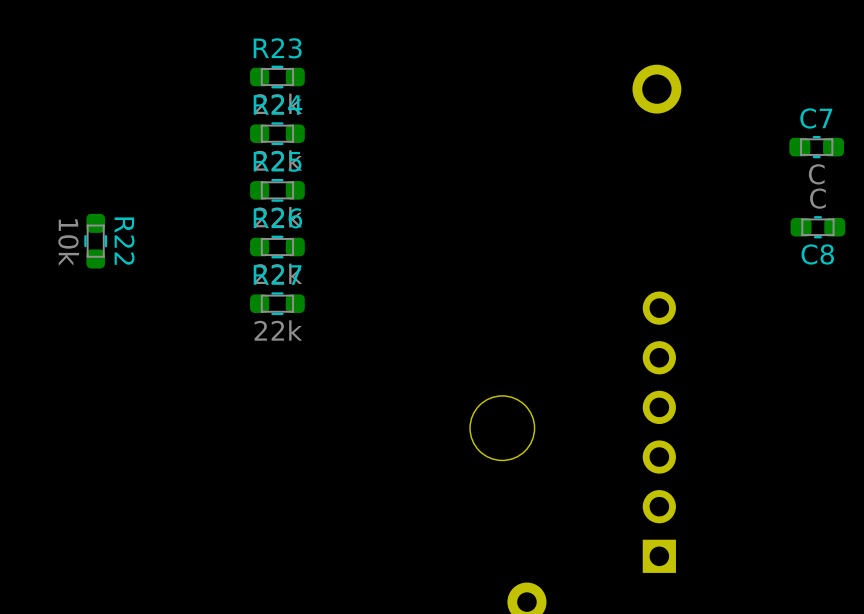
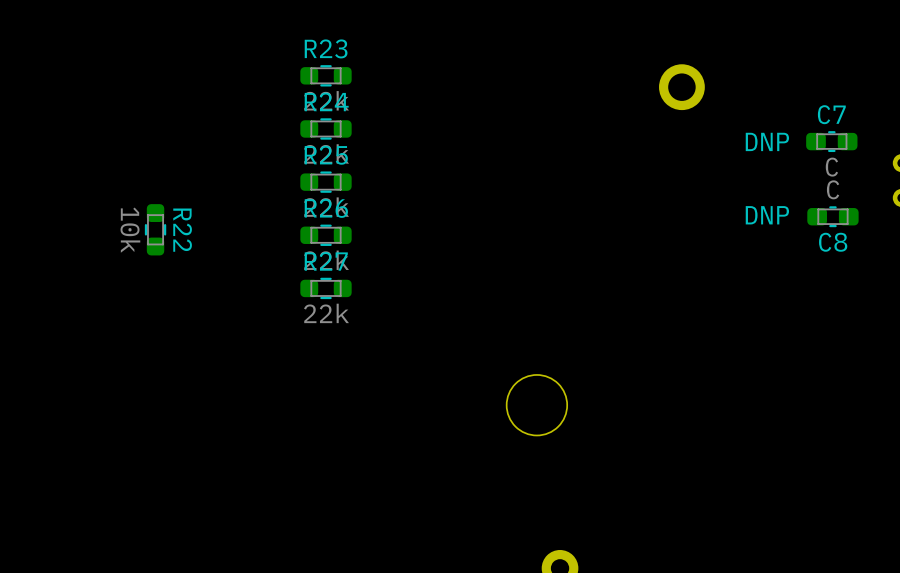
text: none -> DNP (767, 141)
text: none -> DNP (767, 215)
part: (659, 432) -> none

